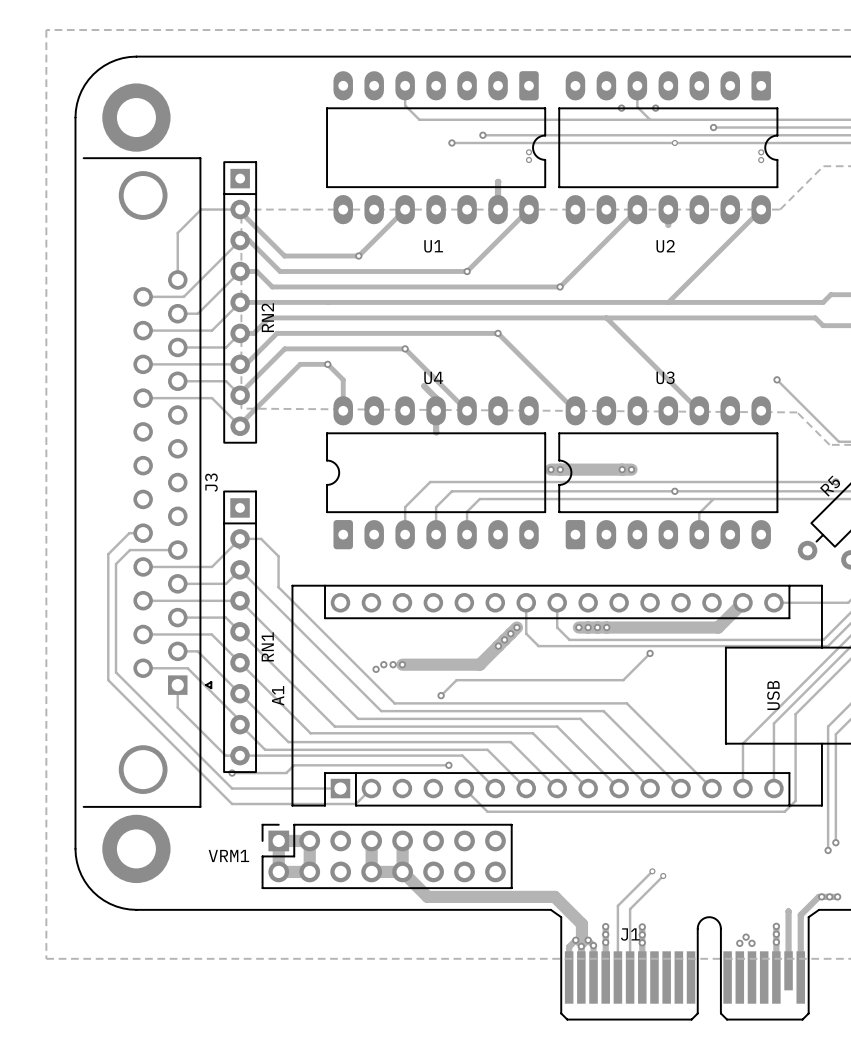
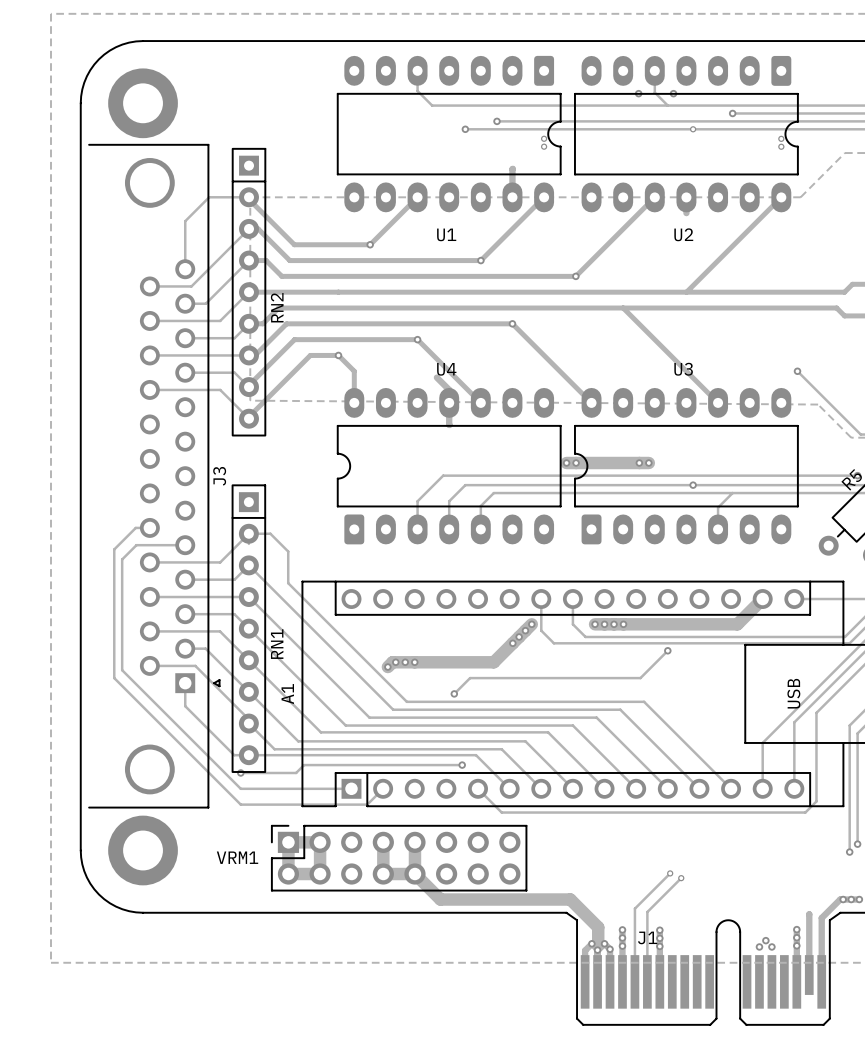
track: none -> (414, 662) (392, 662) (387, 667)

